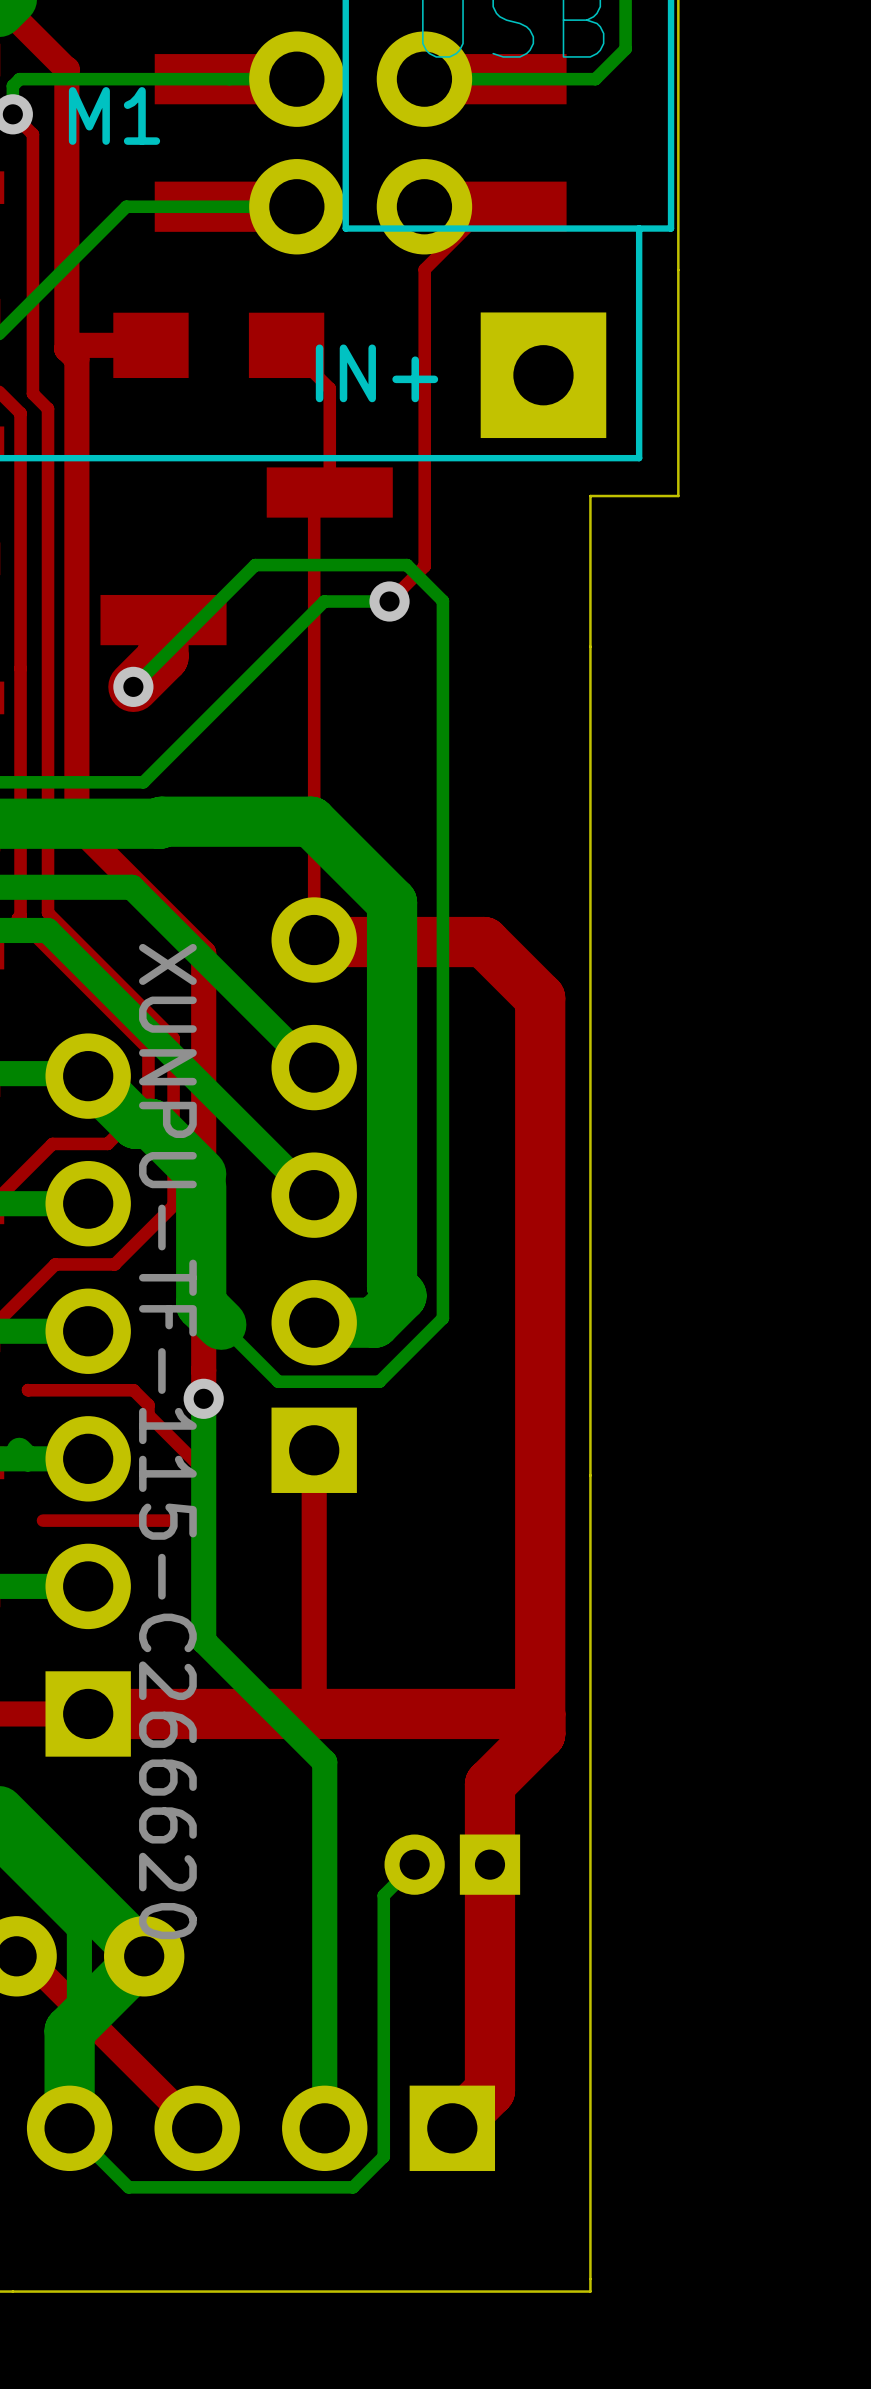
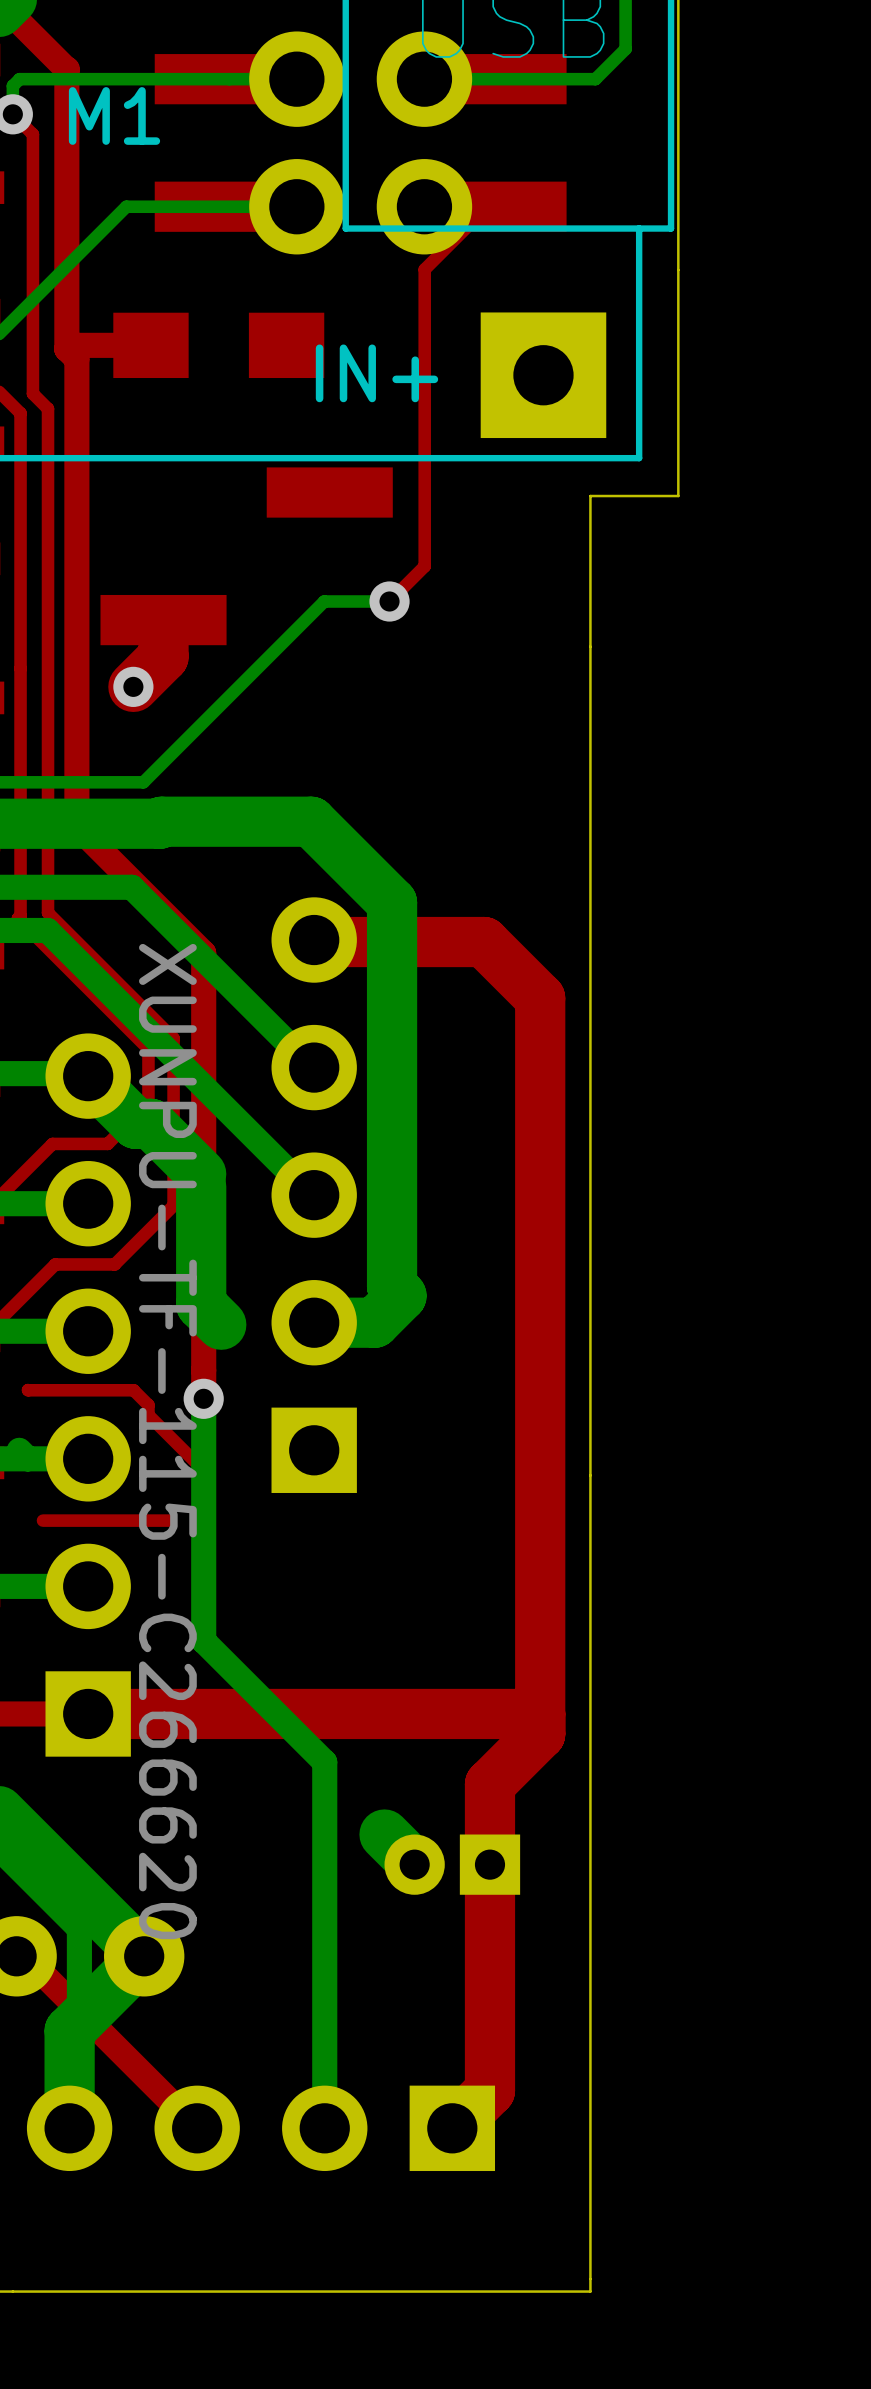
top track: (286, 345) (329, 388) (329, 492) (314, 508) (314, 940) -> none
bottom track: (133, 686) (255, 565) (407, 565) (442, 600) (442, 1318) (379, 1381) (278, 1381) (221, 1324) -> none
top track: (314, 1450) (314, 1711) (311, 1713) -> none
bottom track: (414, 1864) (383, 1895) (383, 2156) (353, 2187) (128, 2187) (69, 2128) -> (414, 1864) (384, 1834)

